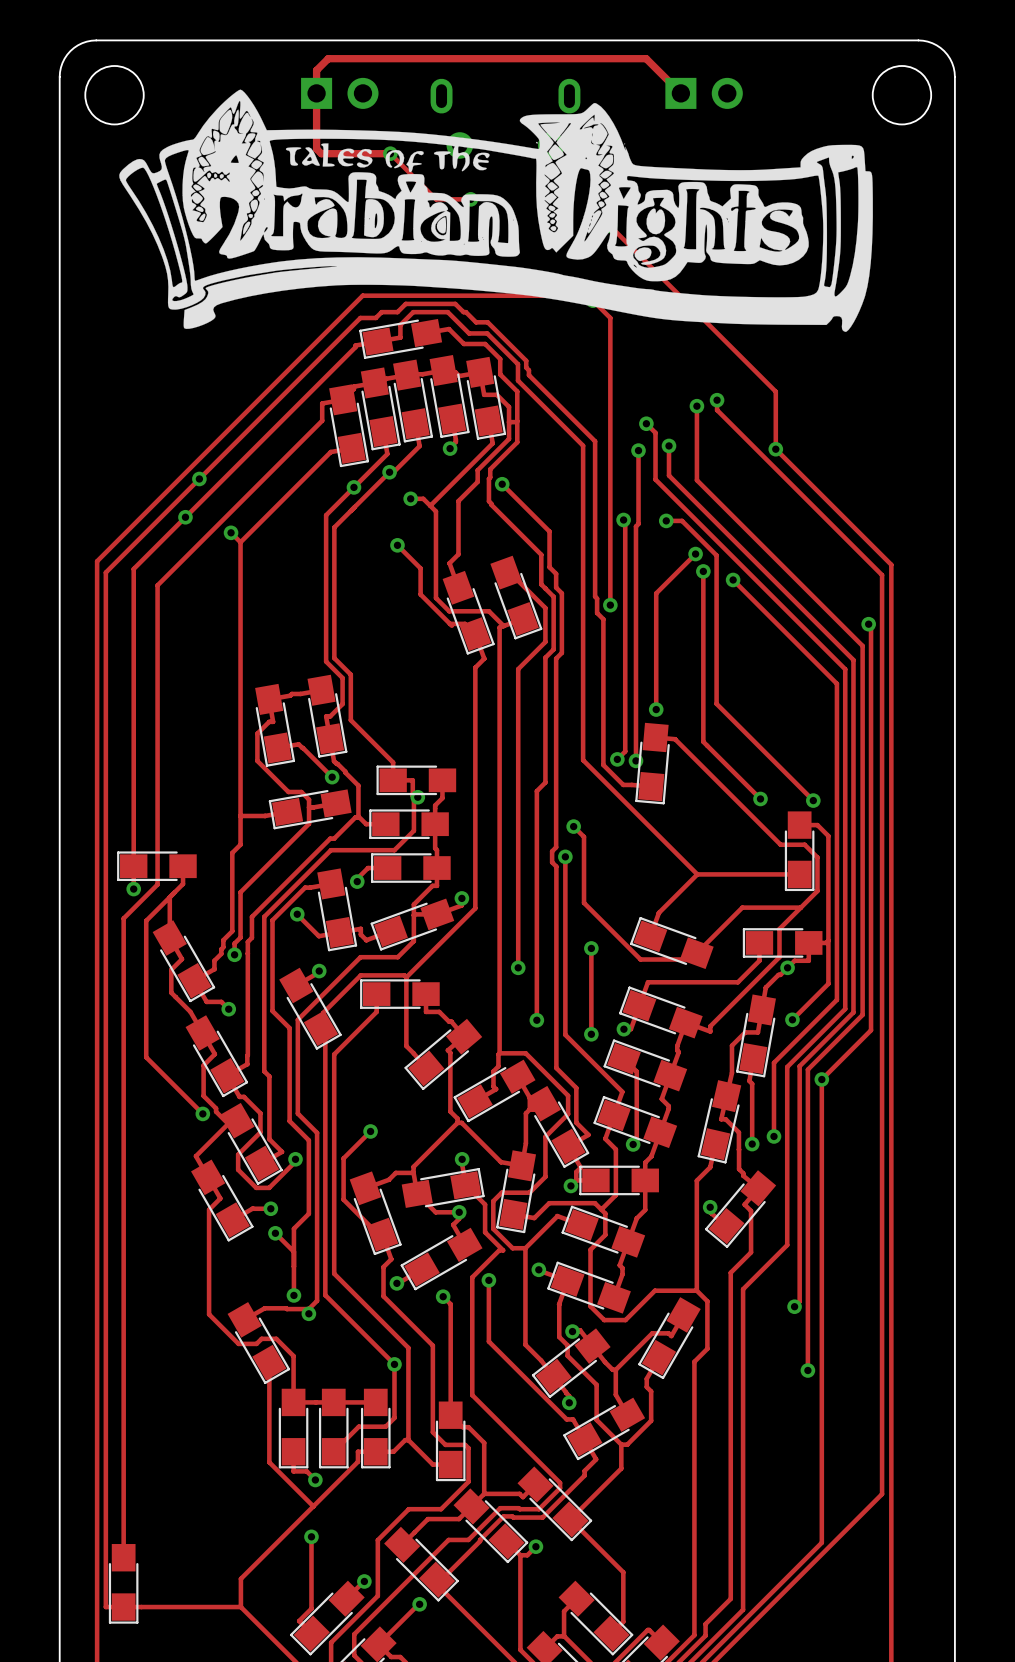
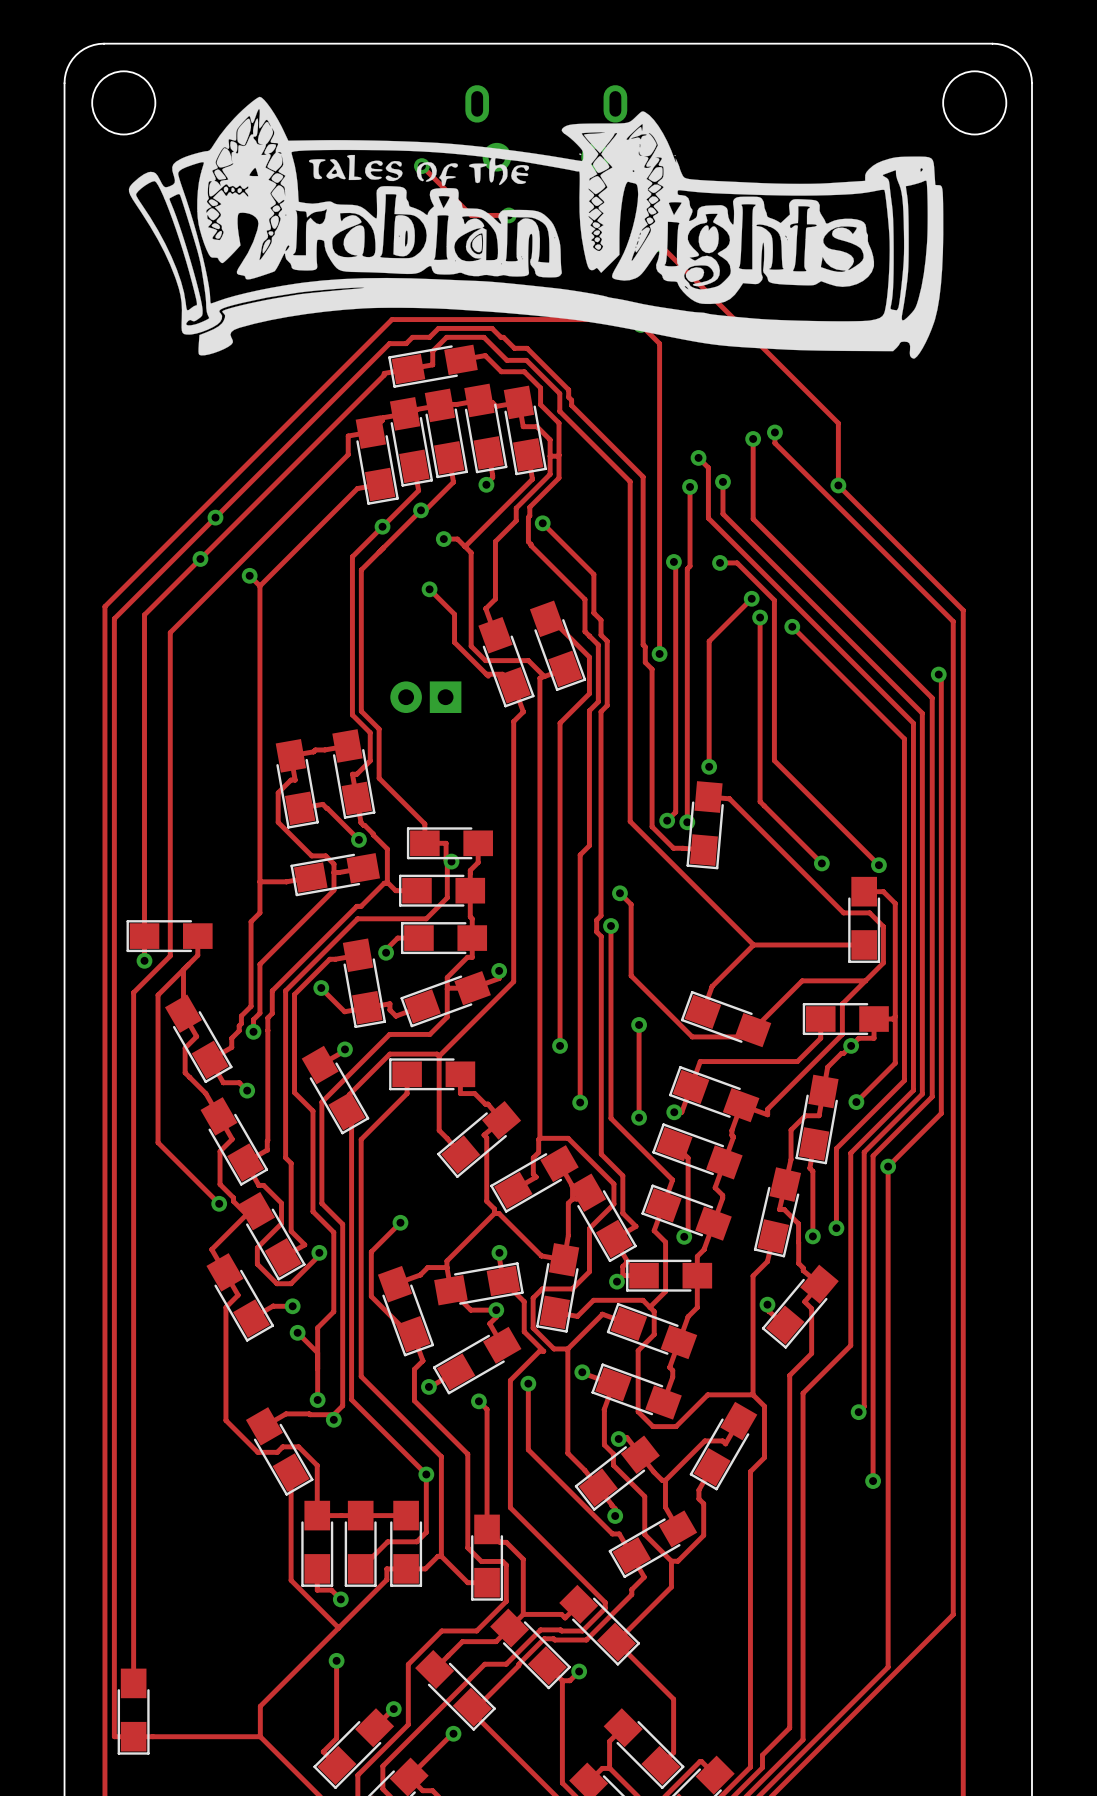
part: (339, 93) -> none
track: (680, 93) (646, 58) (328, 58) (316, 70) (316, 148) (321, 153) (390, 153) -> none
part: (704, 93) -> none
part: none -> (425, 697)

